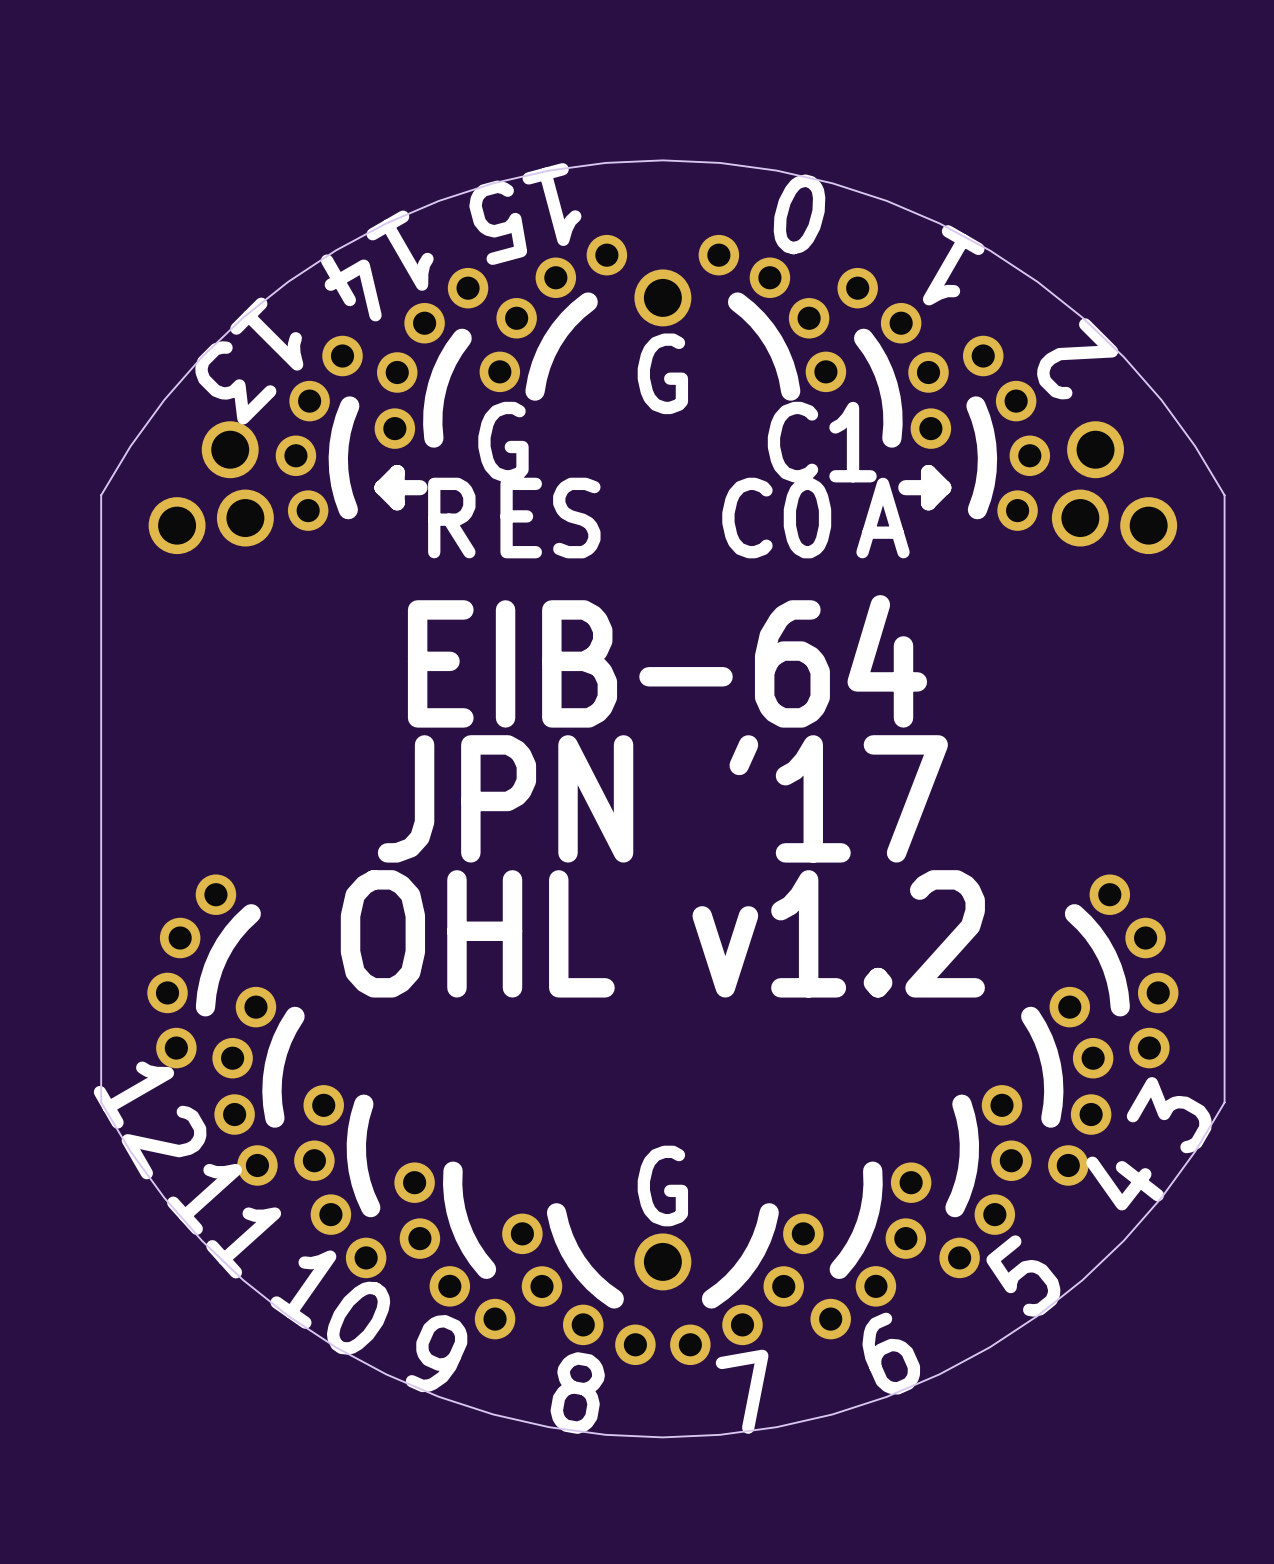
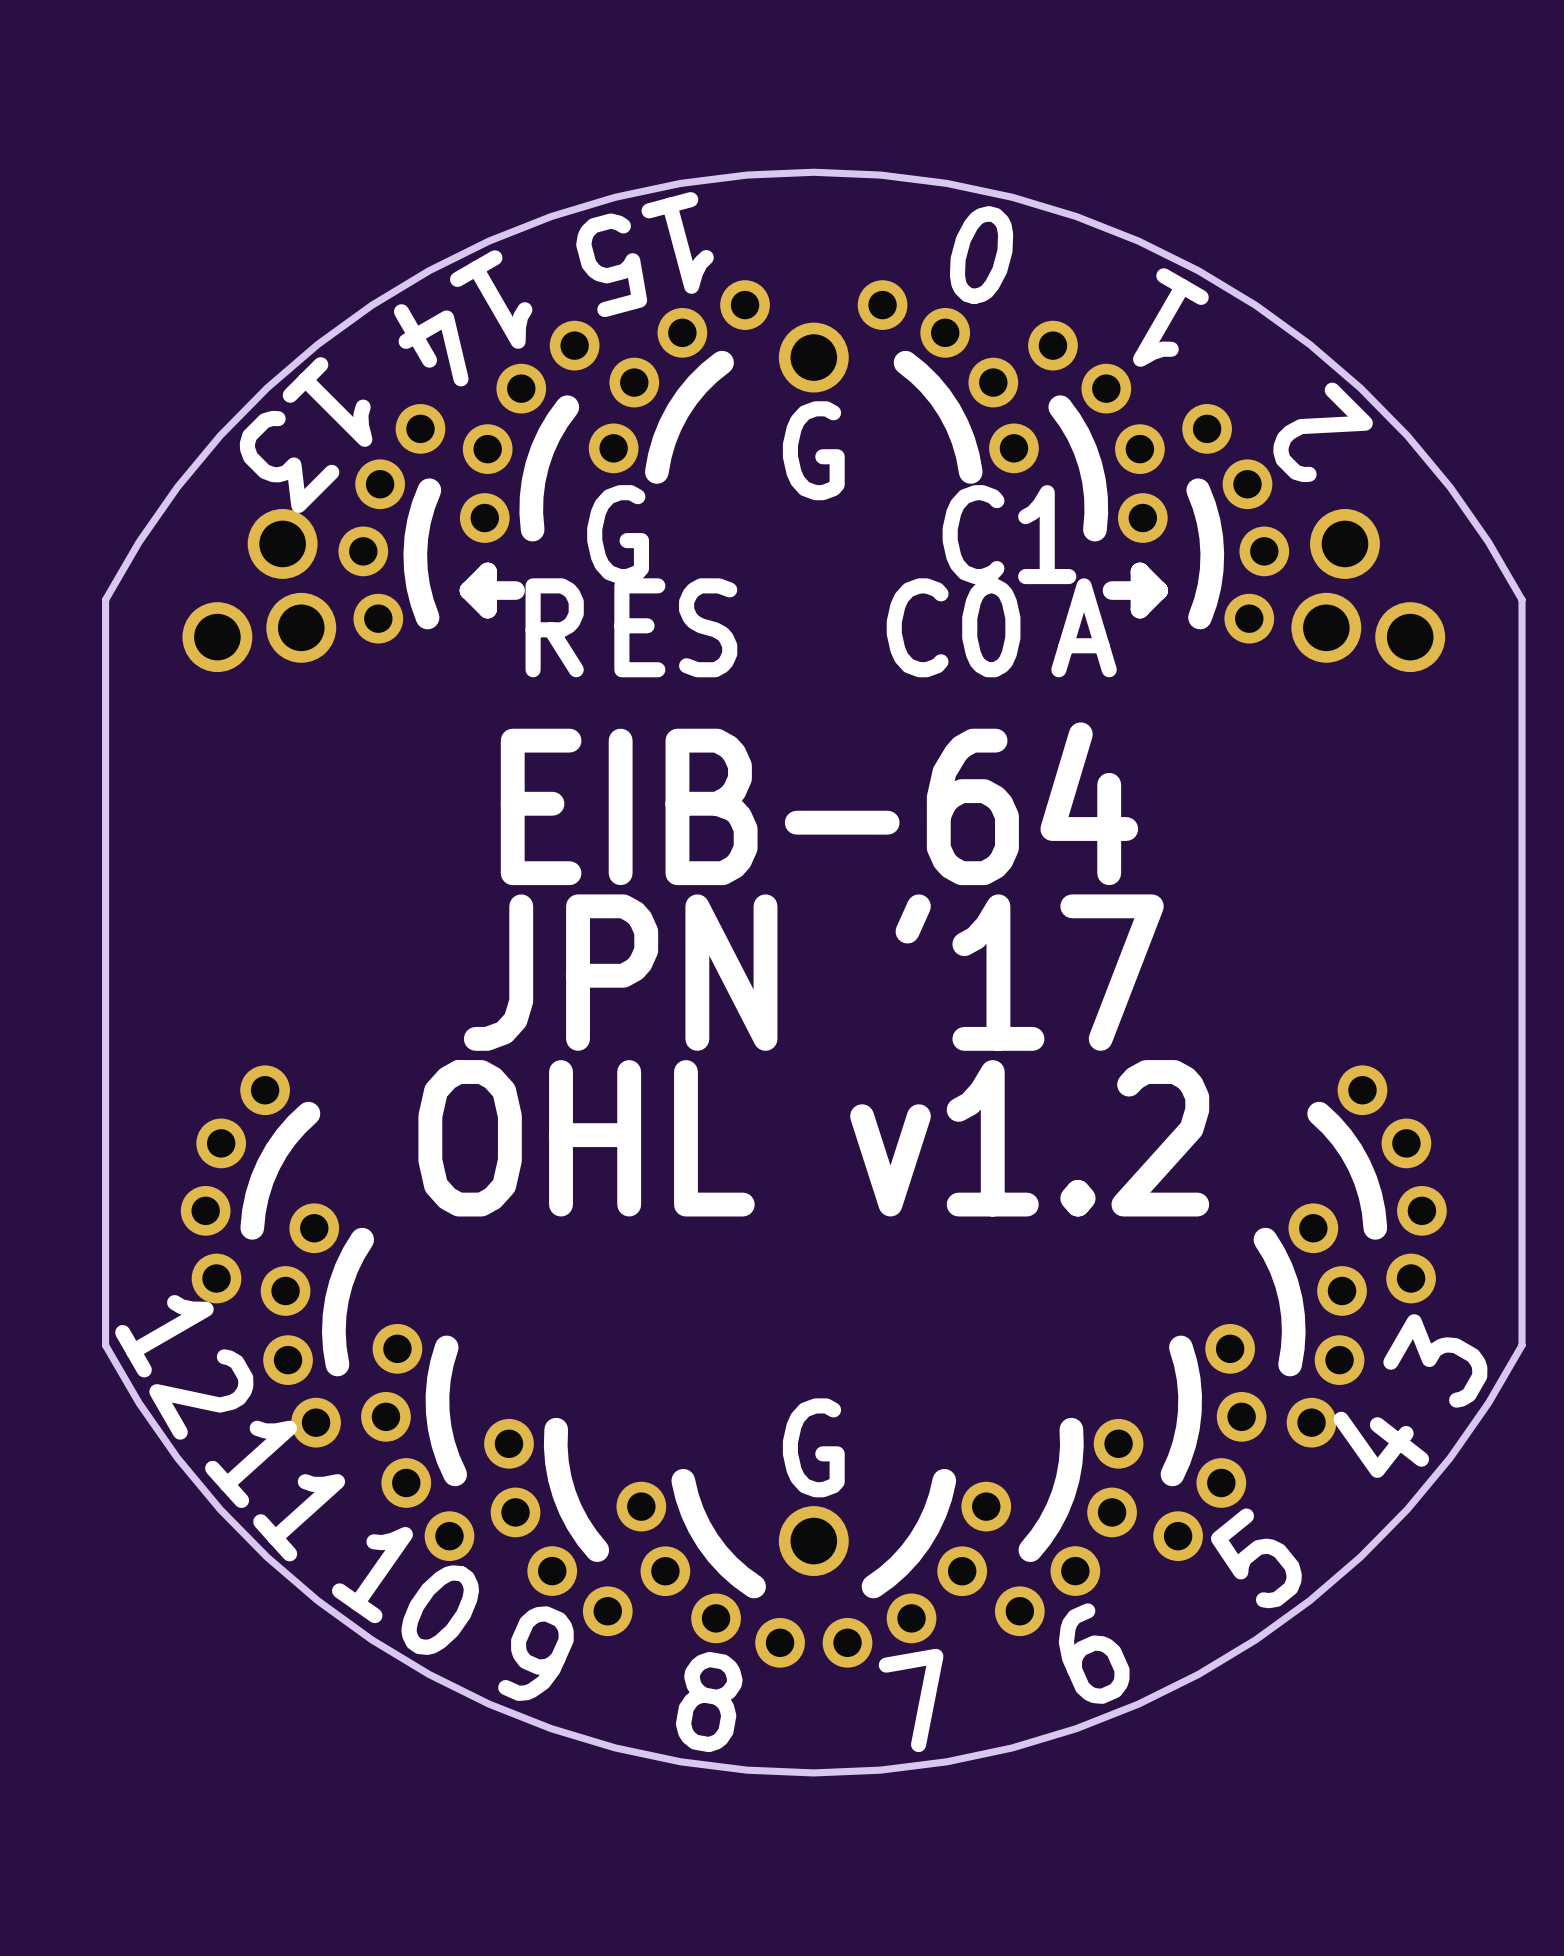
board edge: (1224, 495) (1224, 1102) (1195, 1151) (1161, 1197) (1123, 1240) (1082, 1280) (1037, 1315) (989, 1347) (939, 1374) (886, 1396) (832, 1414) (776, 1427) (720, 1434) (662, 1437) (605, 1434) (549, 1427) (493, 1414) (438, 1396) (386, 1374) (335, 1347) (288, 1315) (243, 1280) (201, 1240) (164, 1197) (130, 1151) (101, 1102) (101, 495) (130, 446) (164, 400) (201, 356) (243, 317) (288, 281) (335, 250) (386, 223) (438, 200) (493, 183) (549, 170) (605, 162) (662, 160) (720, 162) (776, 170) (832, 183) (886, 200) (939, 223) (989, 250) (1037, 281) (1082, 317) (1123, 356) (1161, 400) (1195, 446) (1224, 495) -> (1522, 599) (1522, 1345) (1488, 1403) (1450, 1457) (1407, 1509) (1360, 1557) (1309, 1600) (1255, 1639) (1198, 1674) (1138, 1704) (1076, 1728) (1012, 1747) (946, 1761) (880, 1770) (813, 1772) (747, 1770) (680, 1761) (615, 1747) (551, 1728) (489, 1704) (429, 1674) (371, 1639) (317, 1600) (267, 1557) (220, 1509) (177, 1457) (139, 1403) (105, 1345) (105, 599) (139, 542) (177, 487) (220, 435) (267, 388) (317, 344) (371, 305) (429, 270) (489, 241) (551, 216) (615, 197) (680, 183) (747, 175) (813, 172) (880, 175) (946, 183) (1012, 197) (1076, 216) (1138, 241) (1198, 270) (1255, 305) (1309, 344) (1360, 388) (1407, 435) (1450, 487) (1488, 542) (1522, 599)

